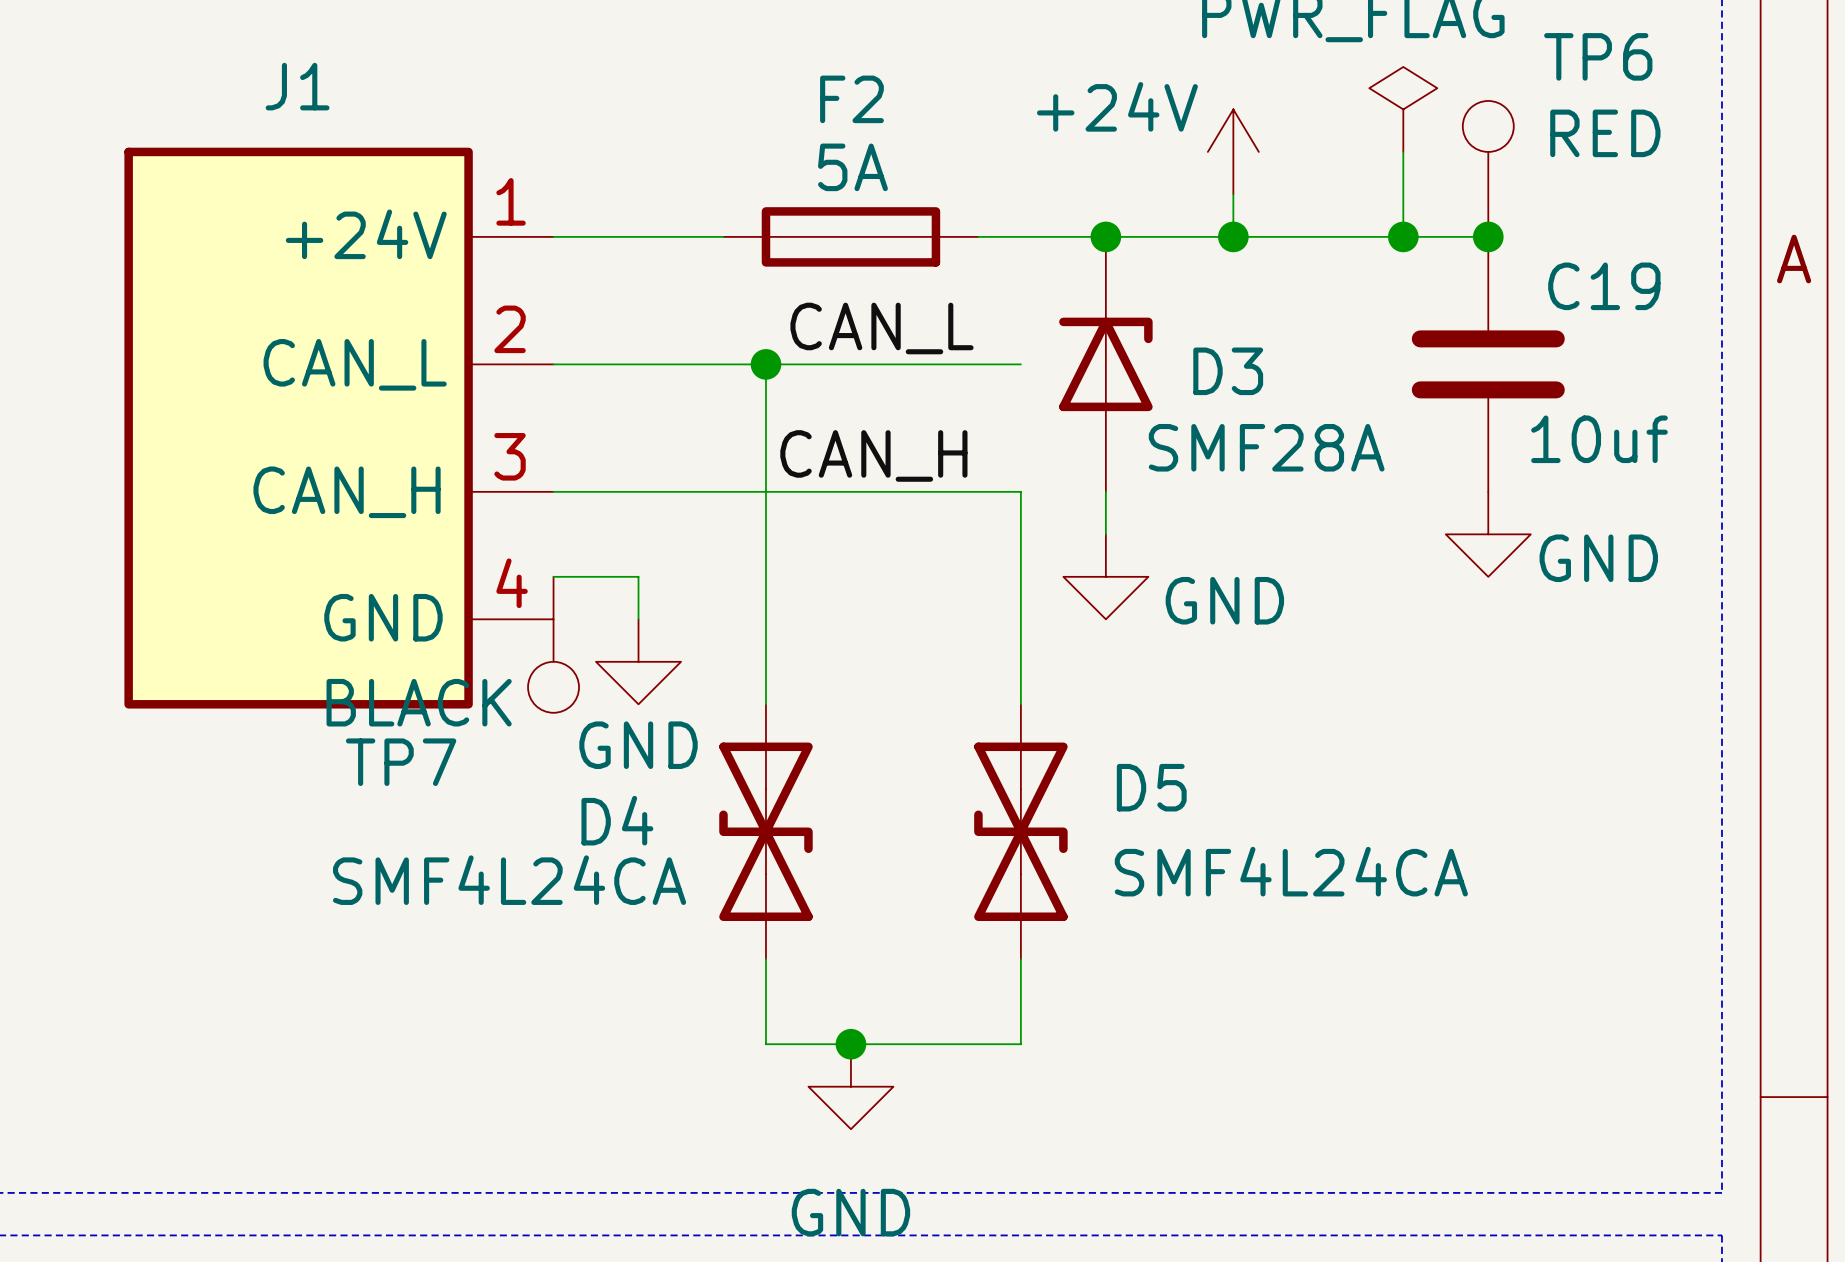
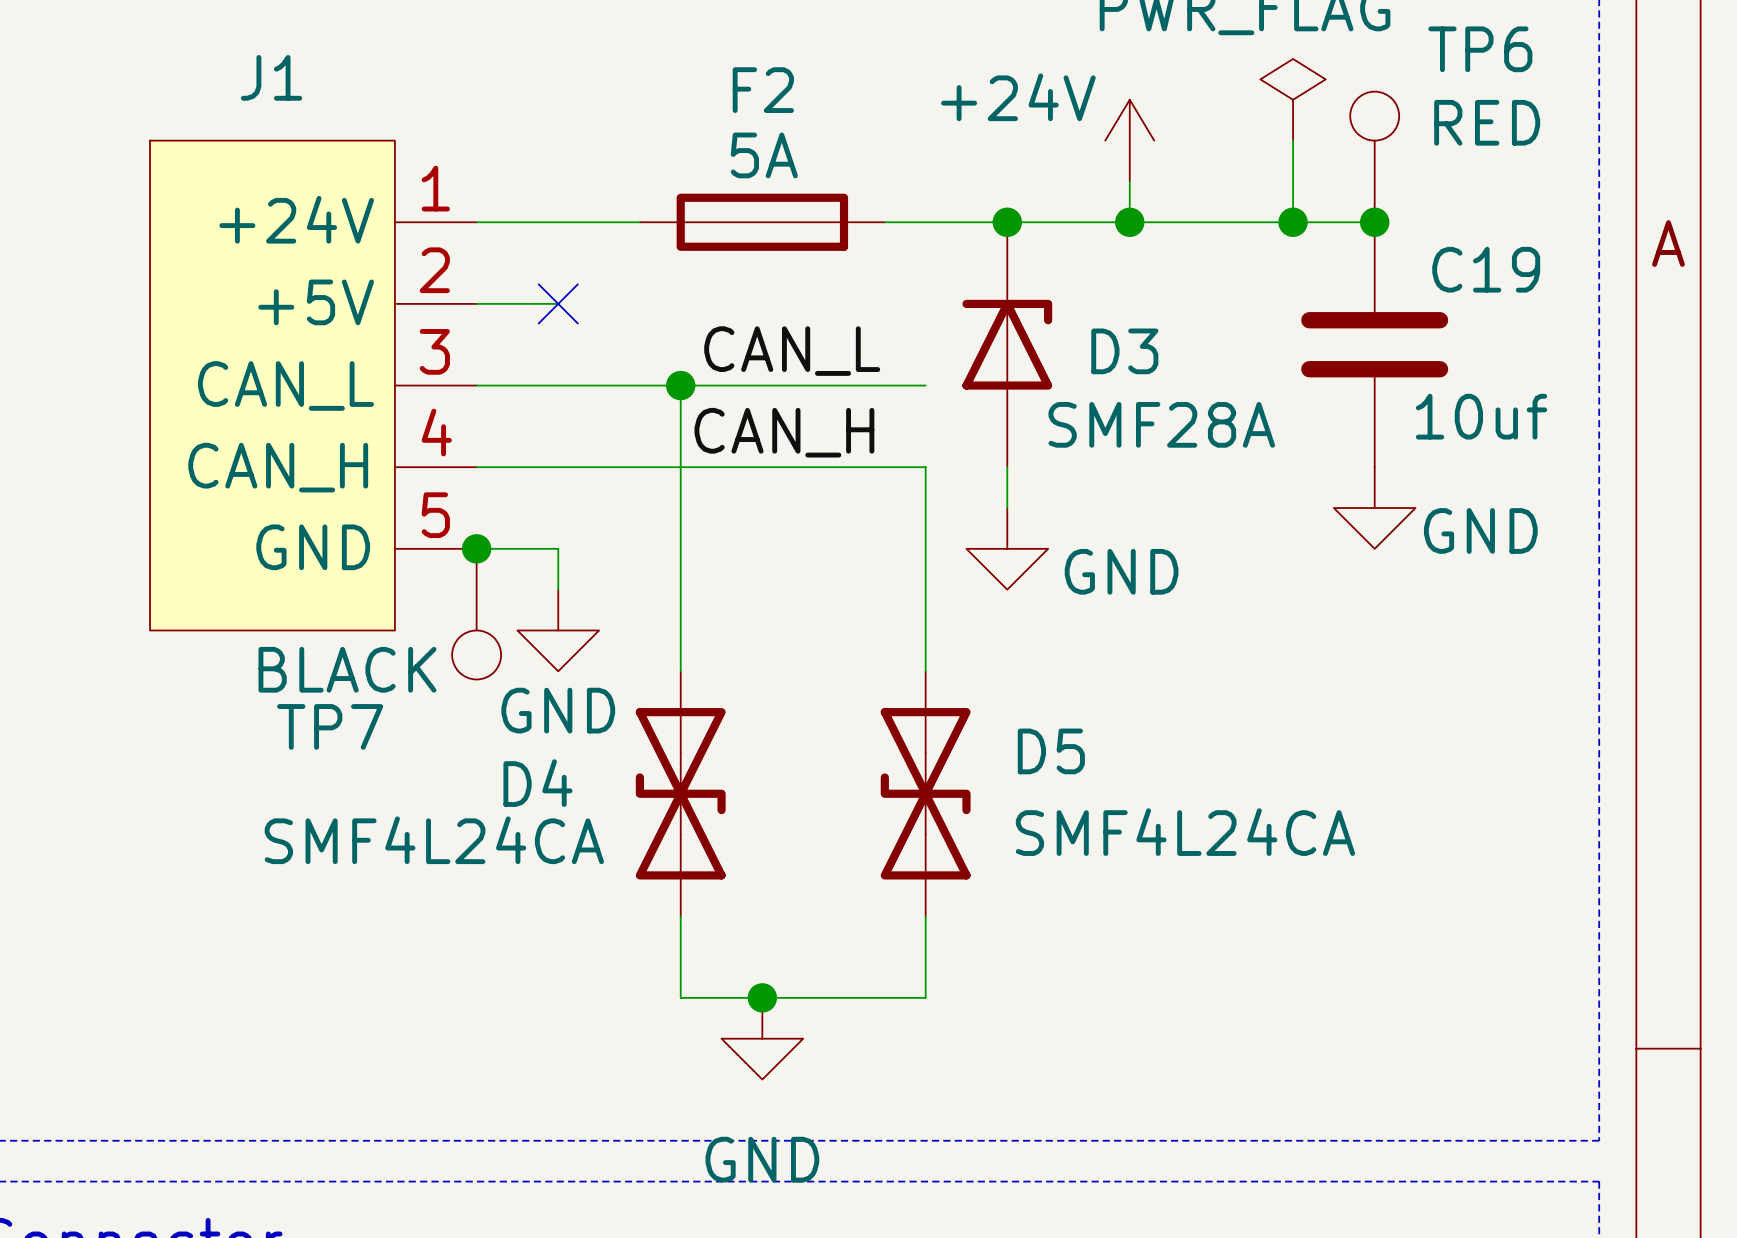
J1 symbol: [124, 147, 554, 709] -> [150, 140, 477, 631]
wire: none -> (476, 303) (558, 303)
no-connect mark: none -> (558, 303)
label position: CAN_L (882, 328) -> CAN_L (792, 351)
wire: (553, 364) (1020, 364) -> (476, 385) (925, 385)
wire: (765, 364) (765, 406) -> none
junction position: (765, 364) -> (680, 385)
junction: none -> (476, 548)

